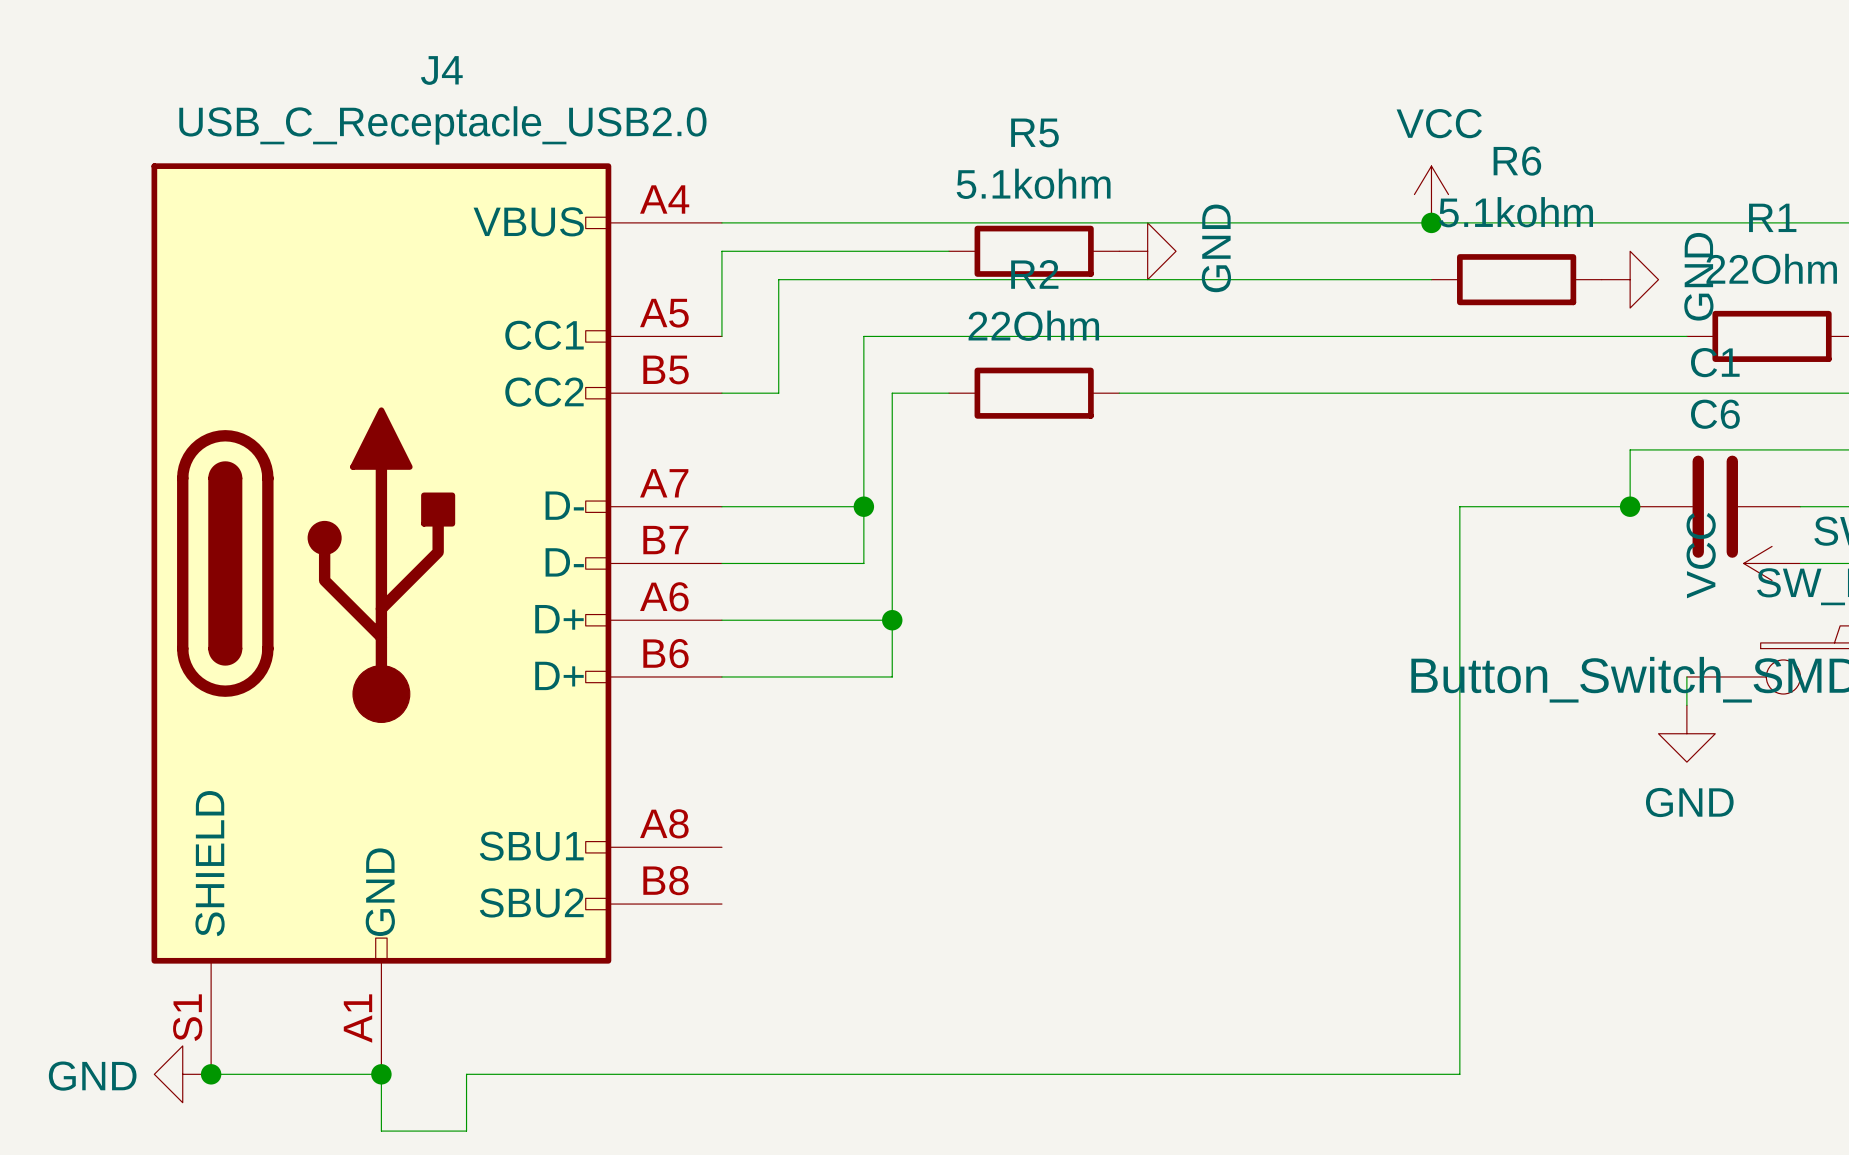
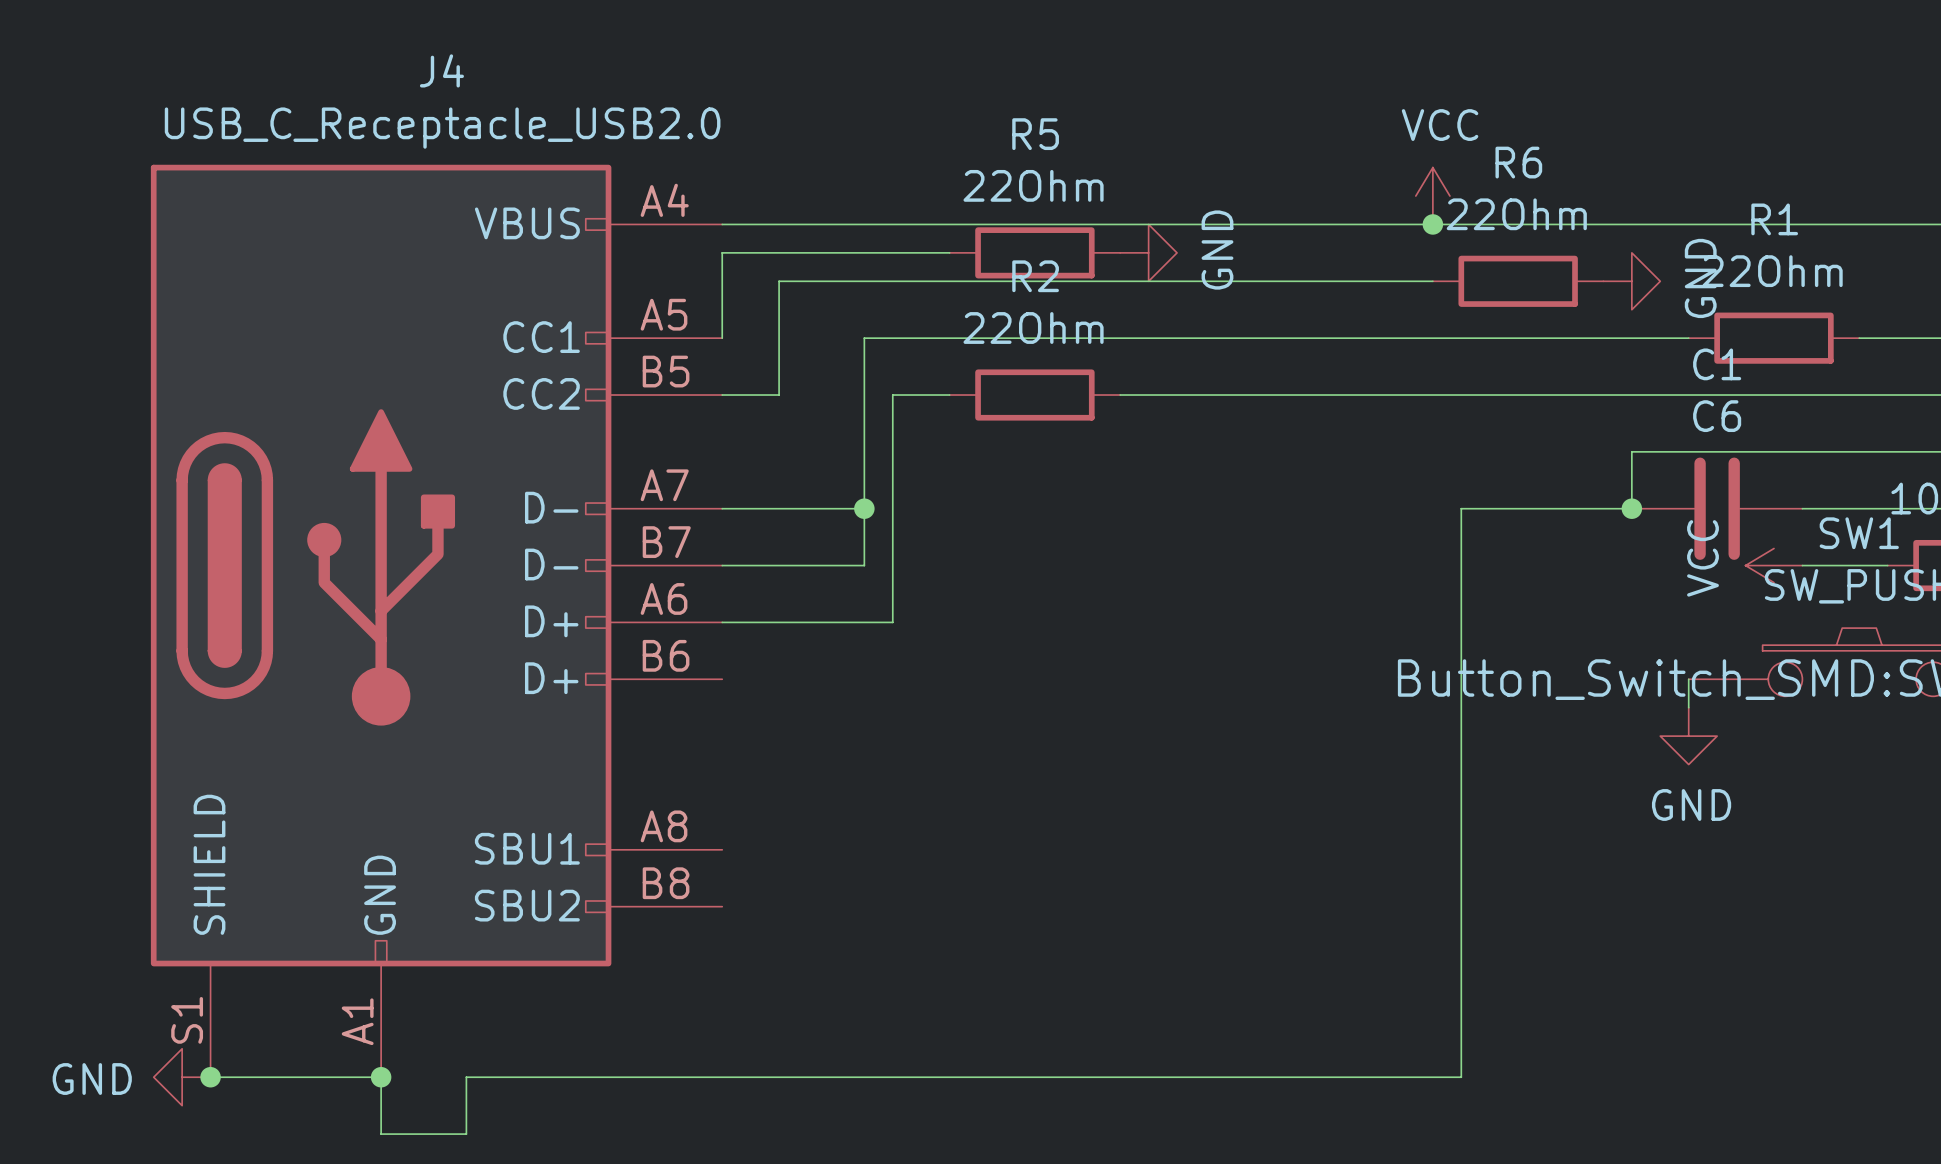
R5 value: 5.1kohm (1033, 183) -> 22Ohm (1033, 185)
R6 value: 5.1kohm (1516, 212) -> 22Ohm (1516, 214)
wire: (892, 620) (892, 676) (721, 676) -> none
junction: (892, 620) -> none

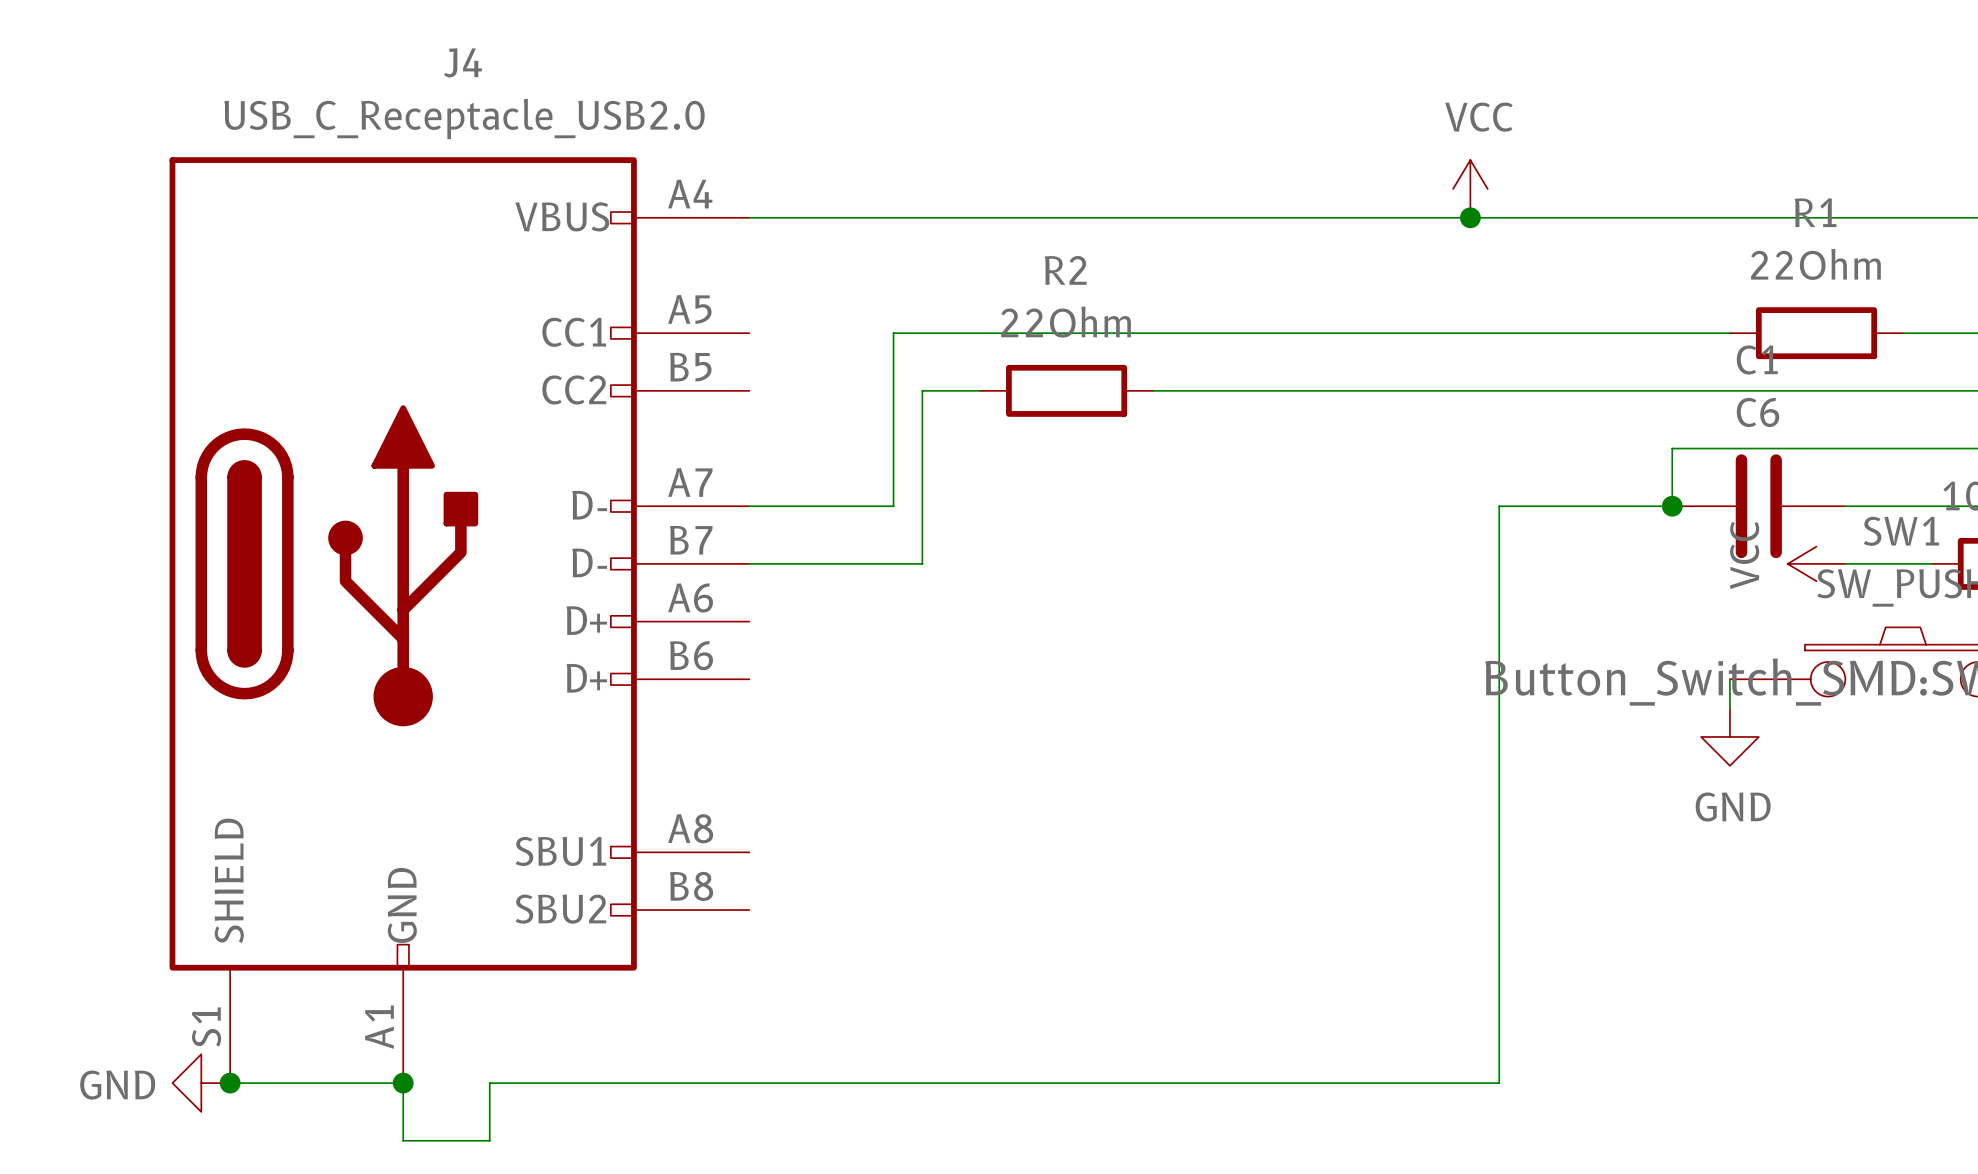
wire: (949, 252) (722, 252) (722, 338) -> none
R5: 22Ohm (1034, 252) -> none
power symbol: GND (1148, 252) -> none
wire: (1432, 281) (779, 281) (779, 395) (722, 395) -> none
R6: 22Ohm (1518, 281) -> none
power symbol: GND (1631, 281) -> none
wire: (864, 508) (864, 565) -> (922, 563) (893, 563)
junction: (864, 508) -> none
wire: (892, 565) (892, 622) (722, 622) -> none

